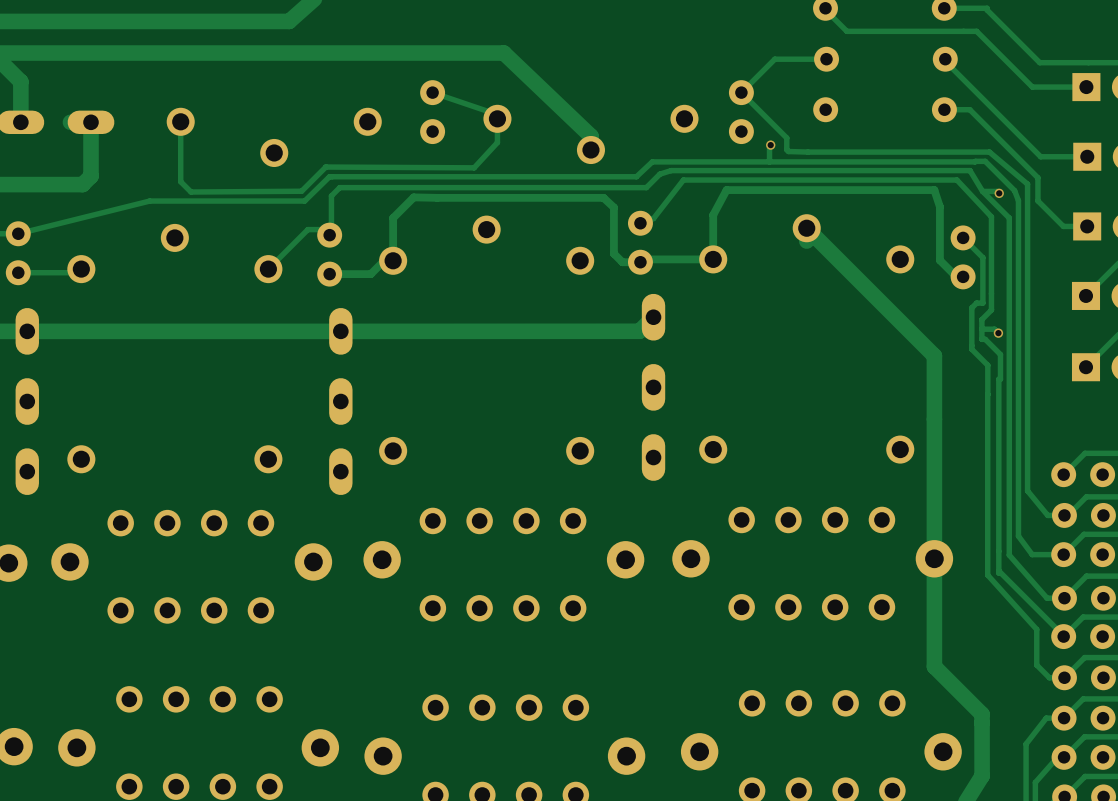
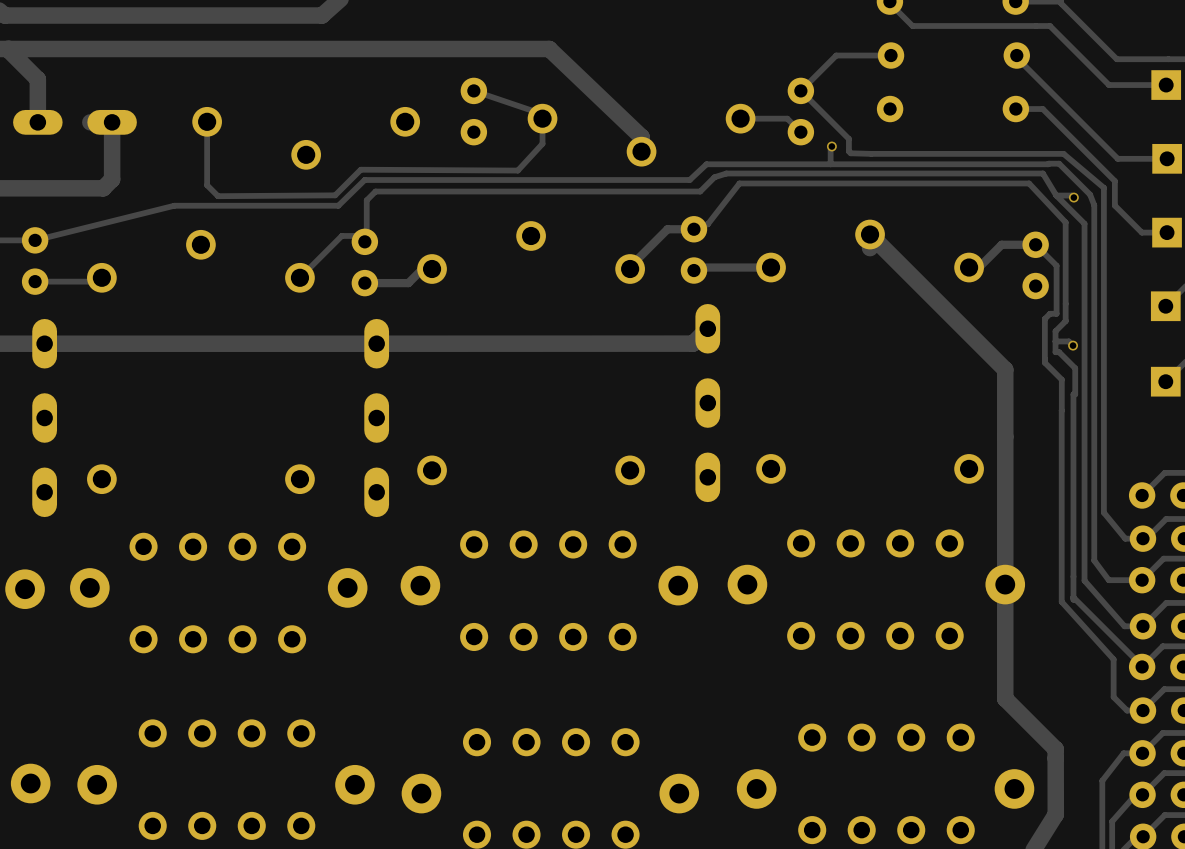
track: none -> (740, 118) (787, 118) (800, 132)
track: none -> (693, 229) (667, 229) (630, 266) (630, 269)
track: none -> (1035, 244) (1001, 244) (978, 267) (969, 267)
track: (713, 259) (713, 215) (726, 190) (934, 190) (939, 206) (939, 260) (956, 276) -> none
track: (393, 260) (393, 218) (413, 197) (603, 197) (613, 207) (613, 253) (622, 262) (640, 262) -> none

